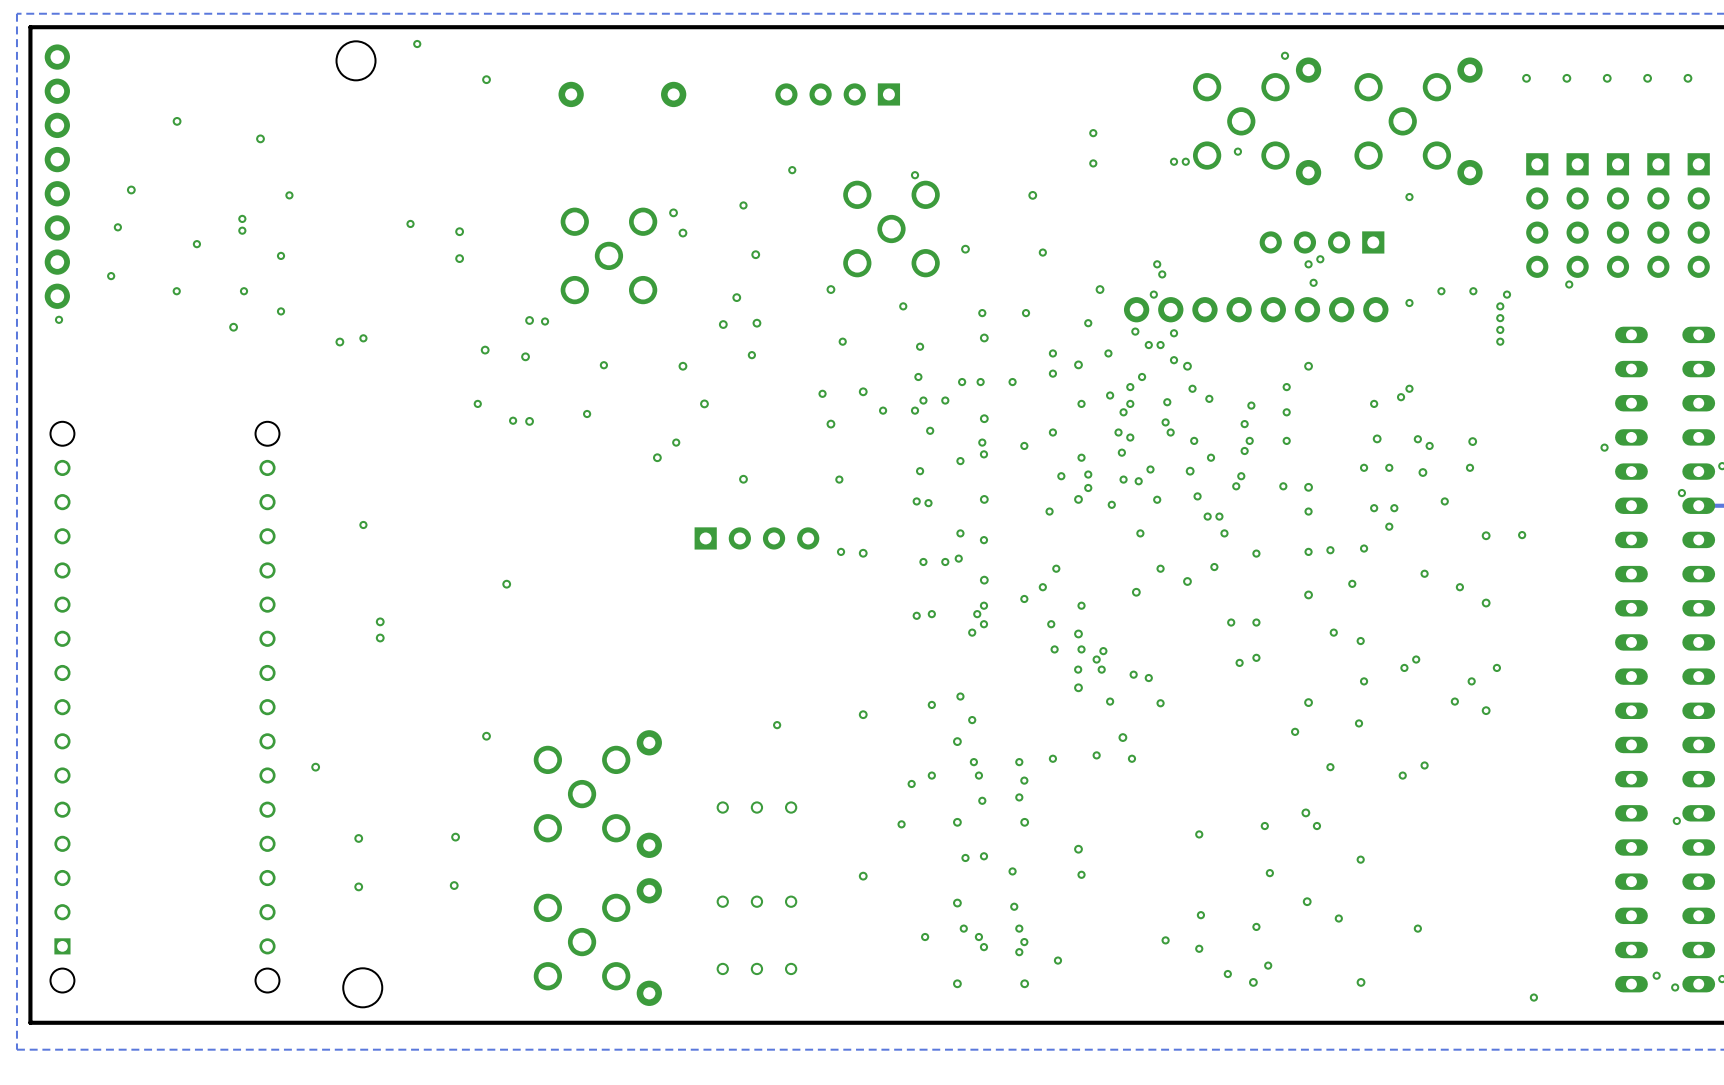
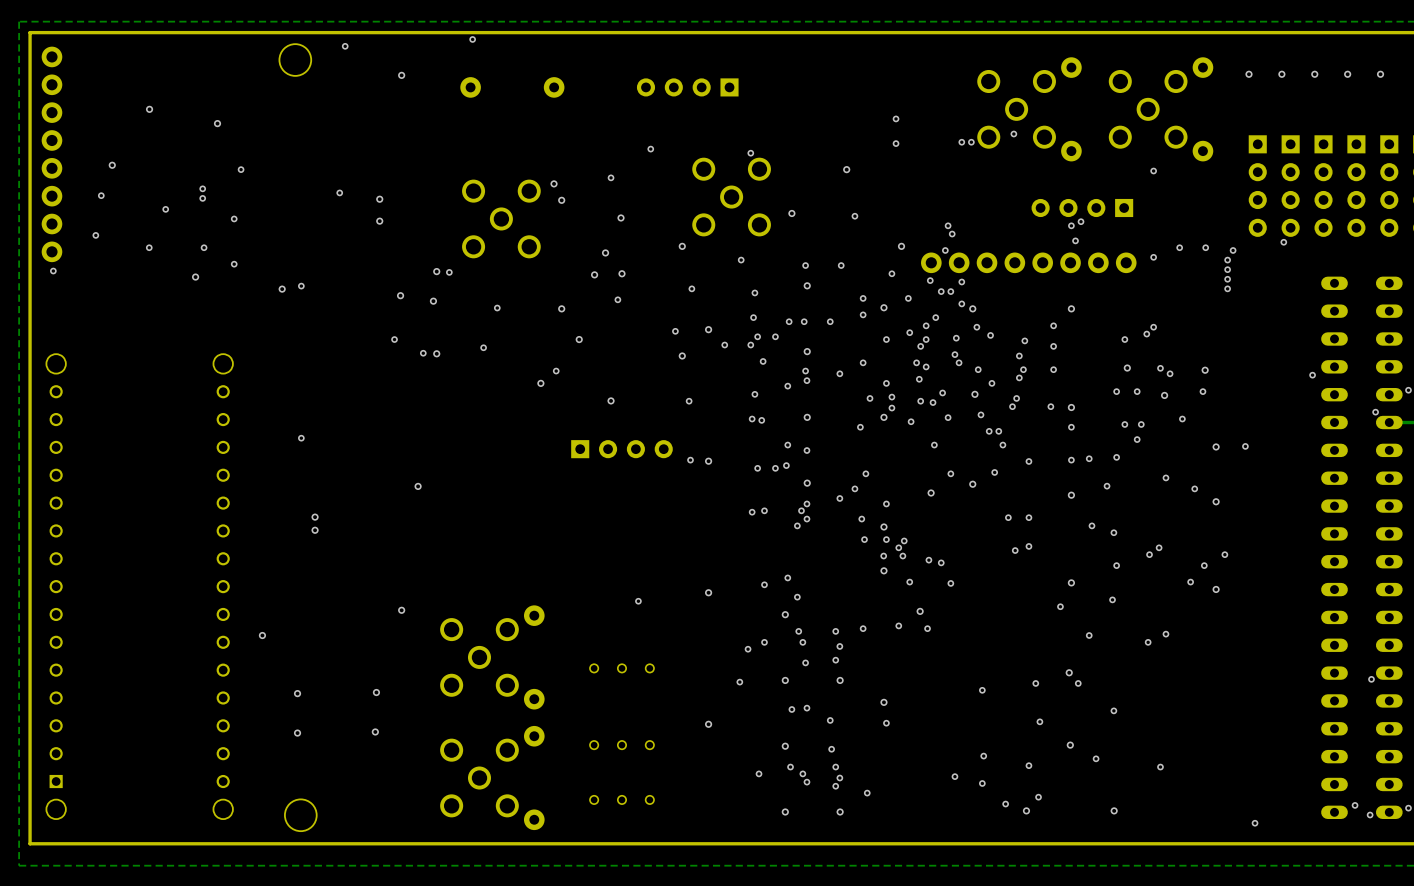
via: none -> (472, 39)
via: (1285, 55) -> none

